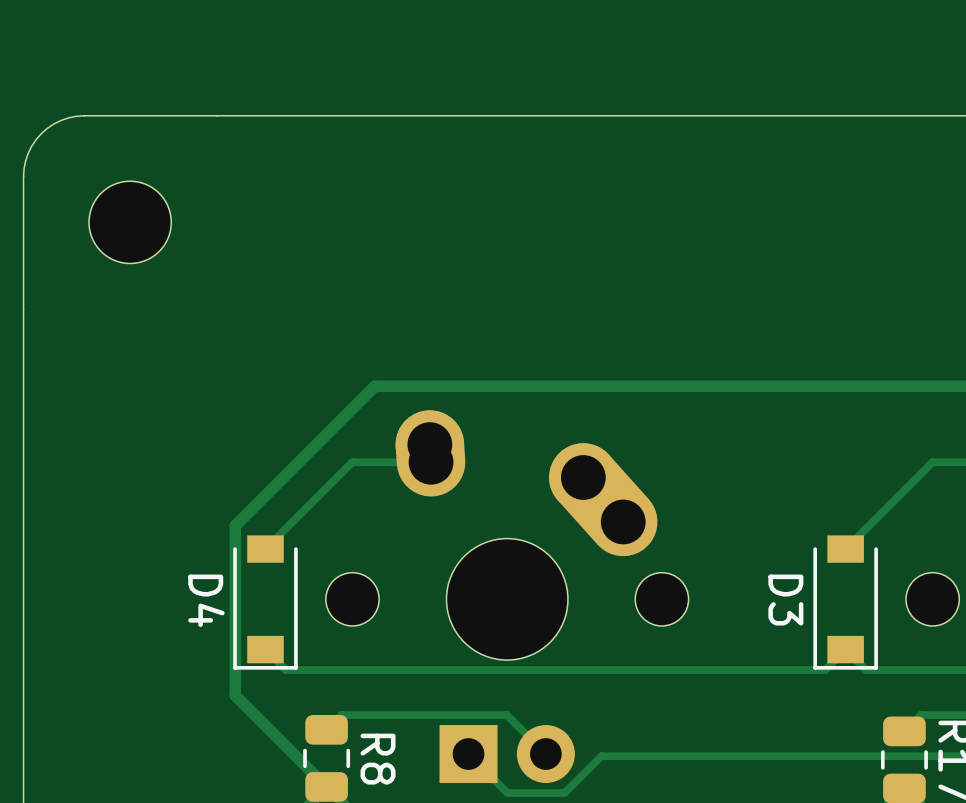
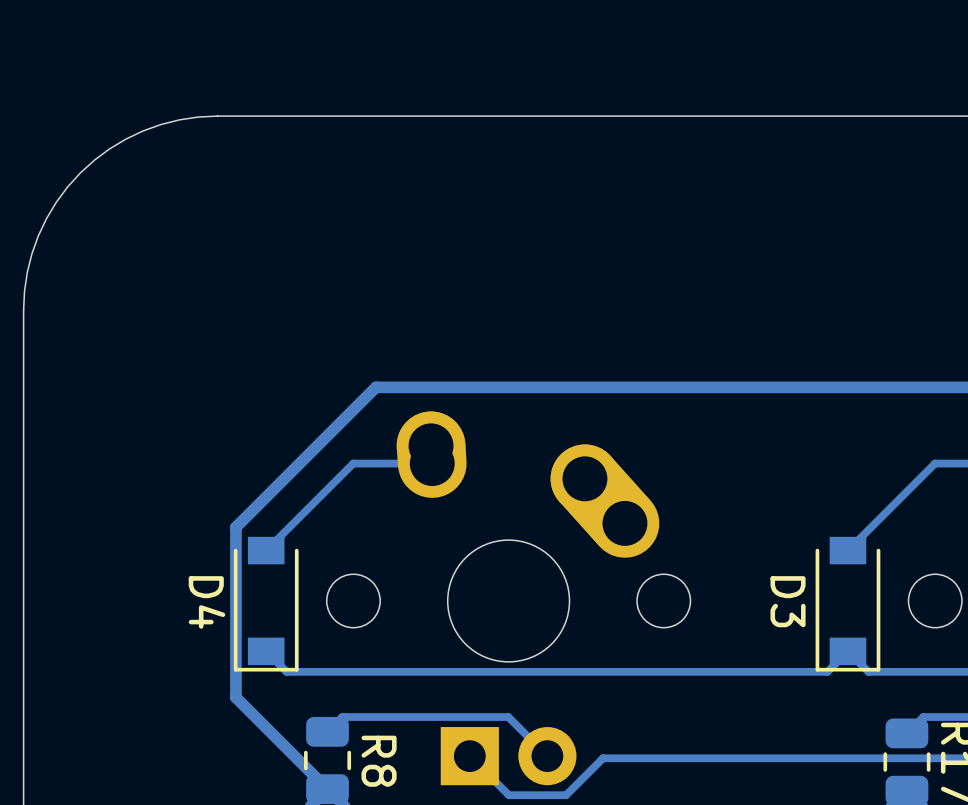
board edge: (216, 115) (76, 116) (54, 123) (41, 133) (28, 153) (24, 168) (23, 309) -> (217, 116) (179, 119) (143, 130) (109, 148) (80, 172) (56, 202) (38, 235) (27, 272) (23, 310)
part: (130, 222) -> none

